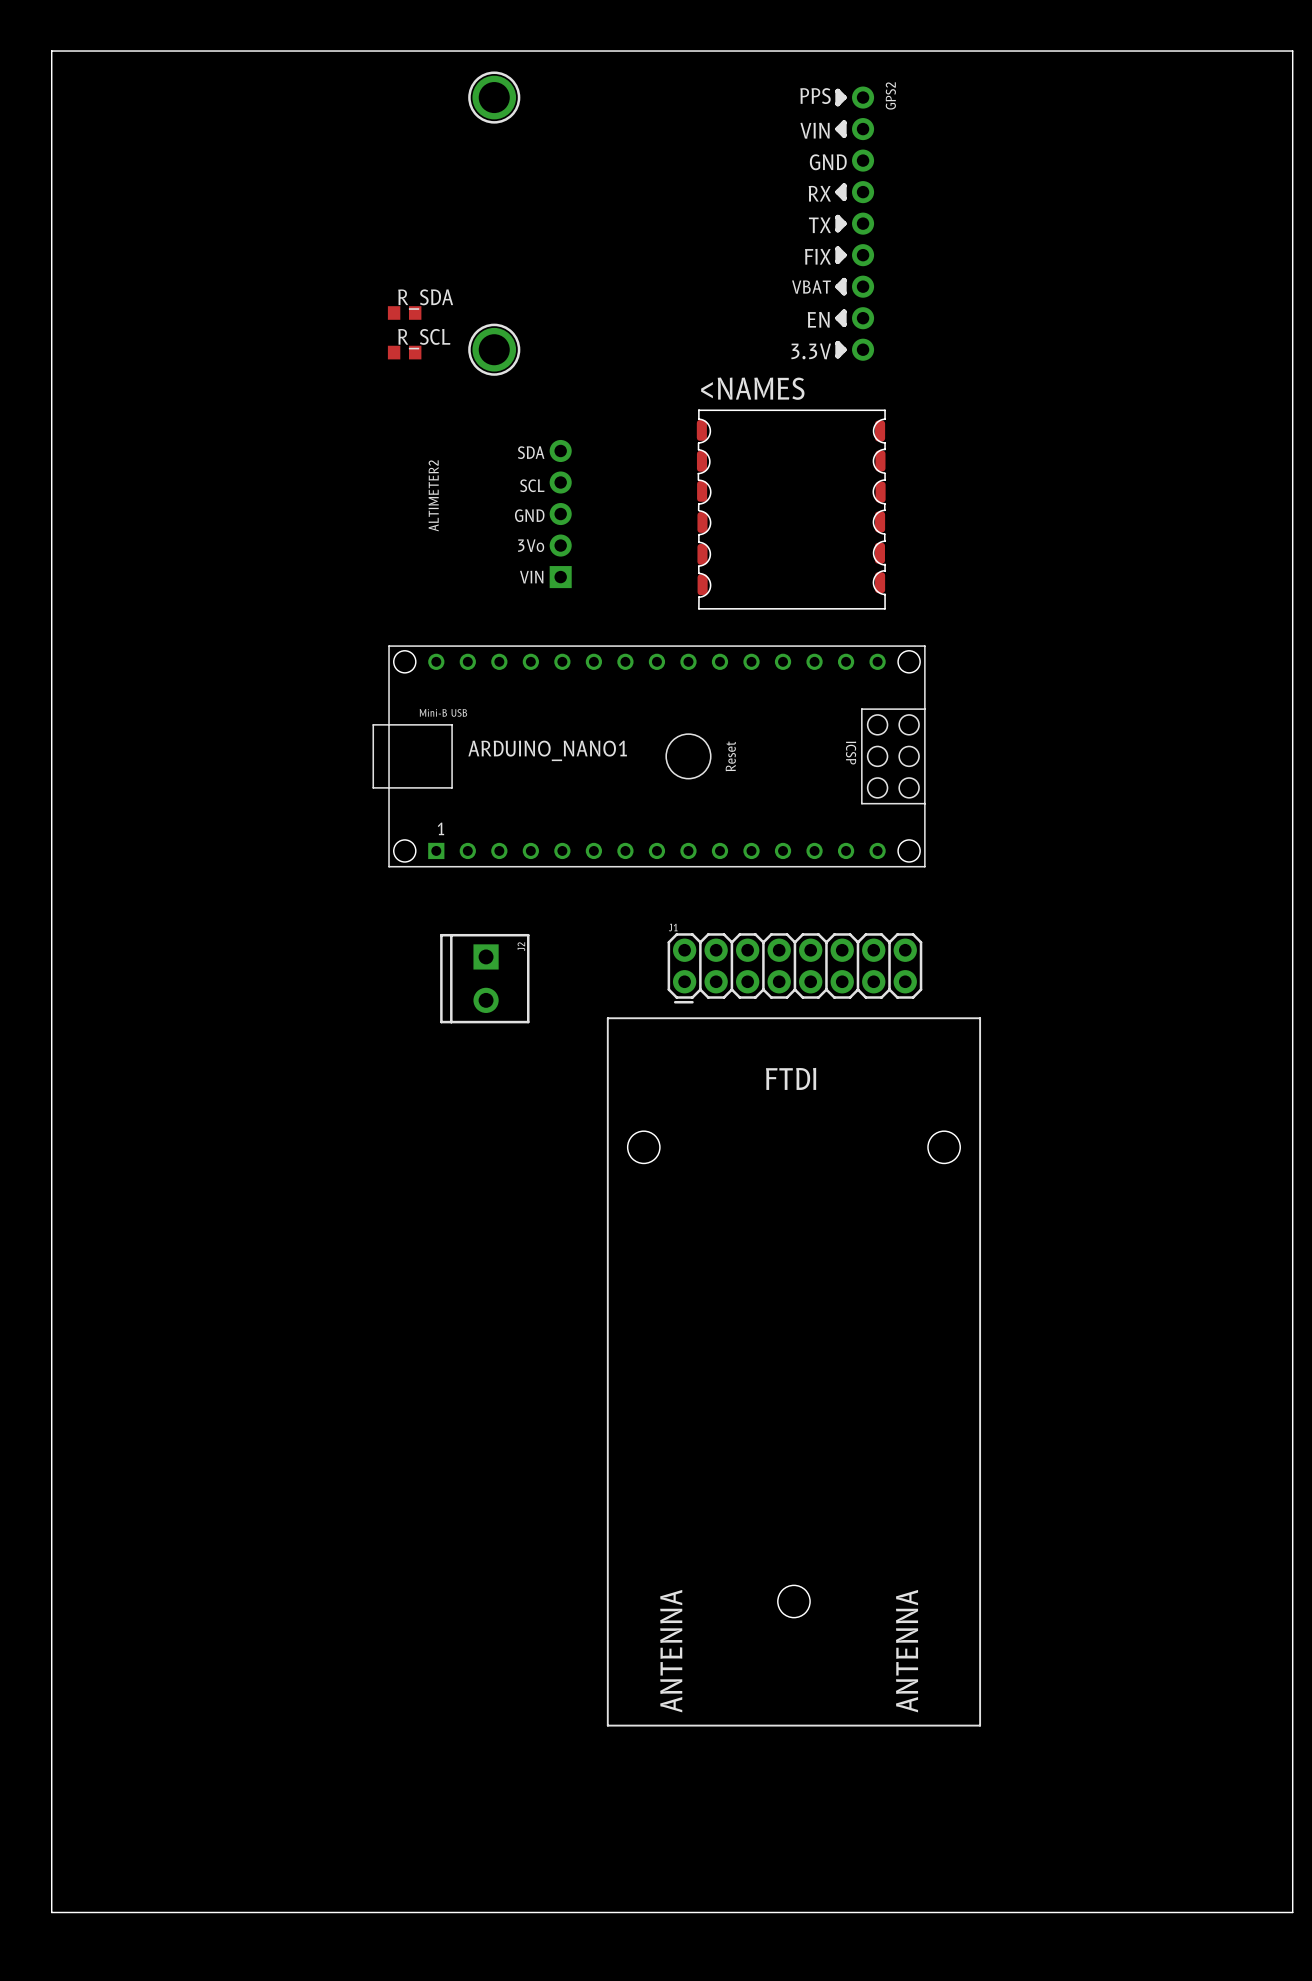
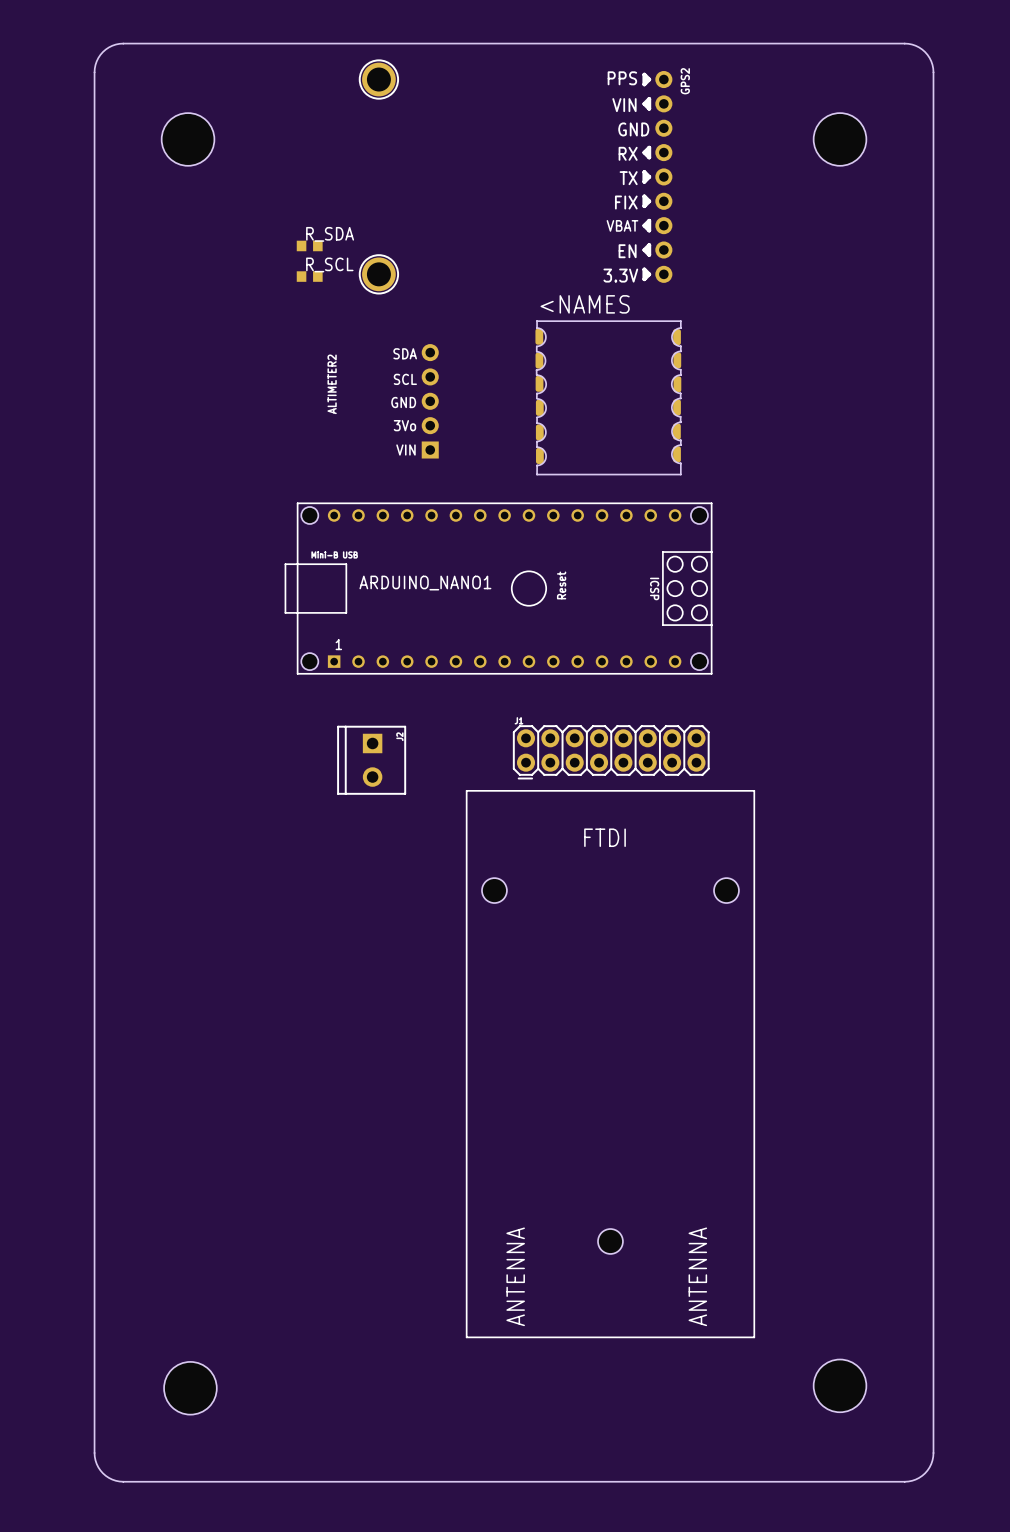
board edge: (163, 51) (51, 51) (51, 1912) (163, 1912) -> (123, 43) (112, 45) (102, 52) (96, 61) (94, 72) (94, 1452) (96, 1464) (102, 1473) (112, 1479) (123, 1481)
board edge: (1174, 51) (1292, 51) (1292, 1912) (1174, 1912) -> (904, 43) (915, 45) (925, 52) (931, 61) (933, 72) (933, 1452) (931, 1464) (925, 1473) (915, 1479) (904, 1481)
hole: none -> (188, 139)
hole: none -> (840, 139)
hole: none -> (840, 1385)
hole: none -> (190, 1388)

